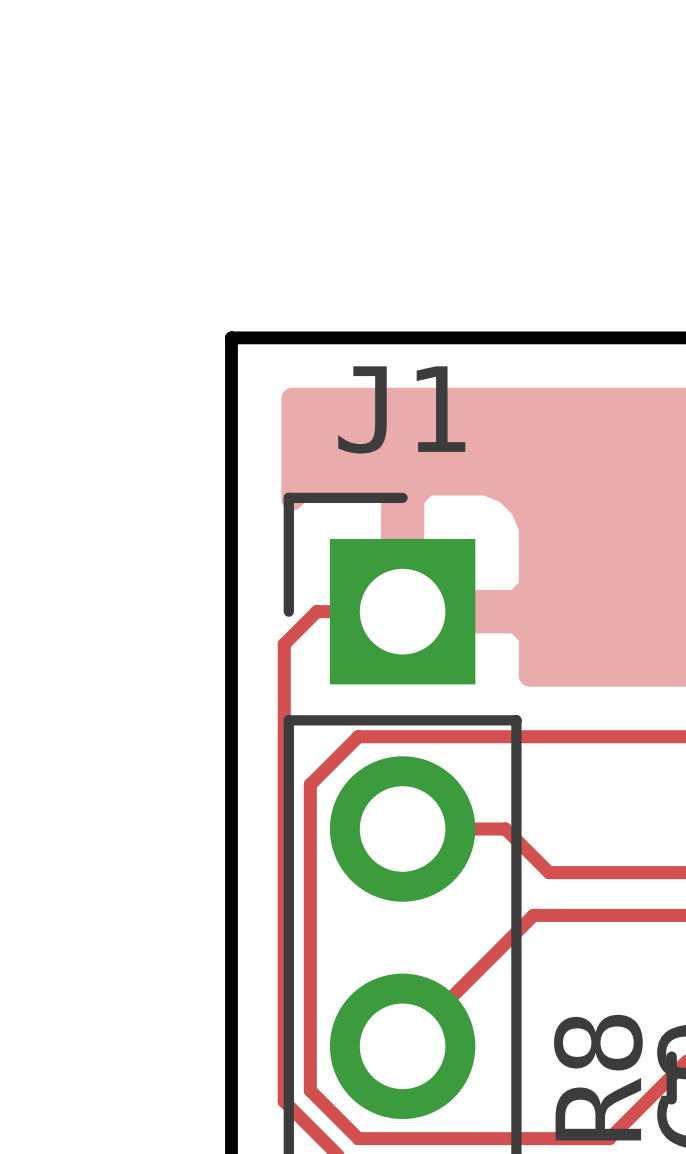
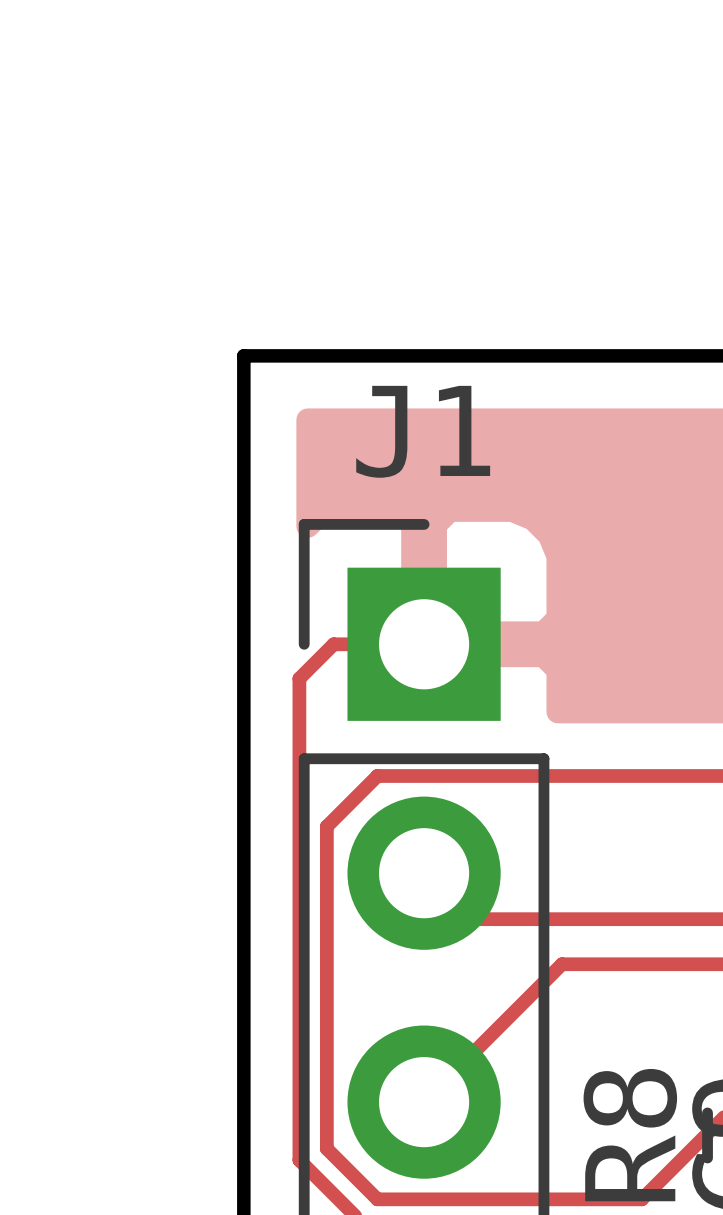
track: (402, 829) (505, 829) (549, 872) -> (424, 873) (470, 919) (578, 919)

